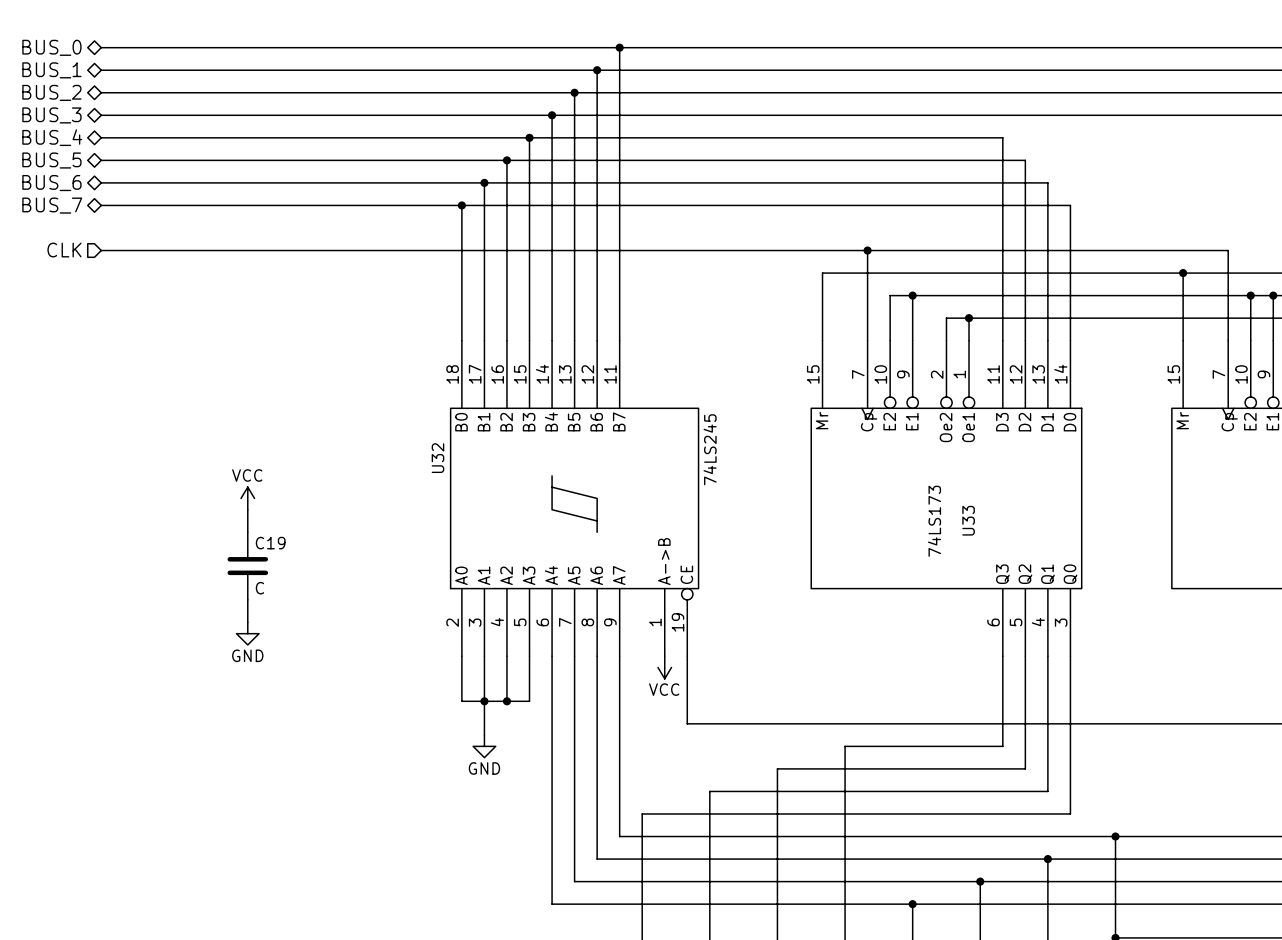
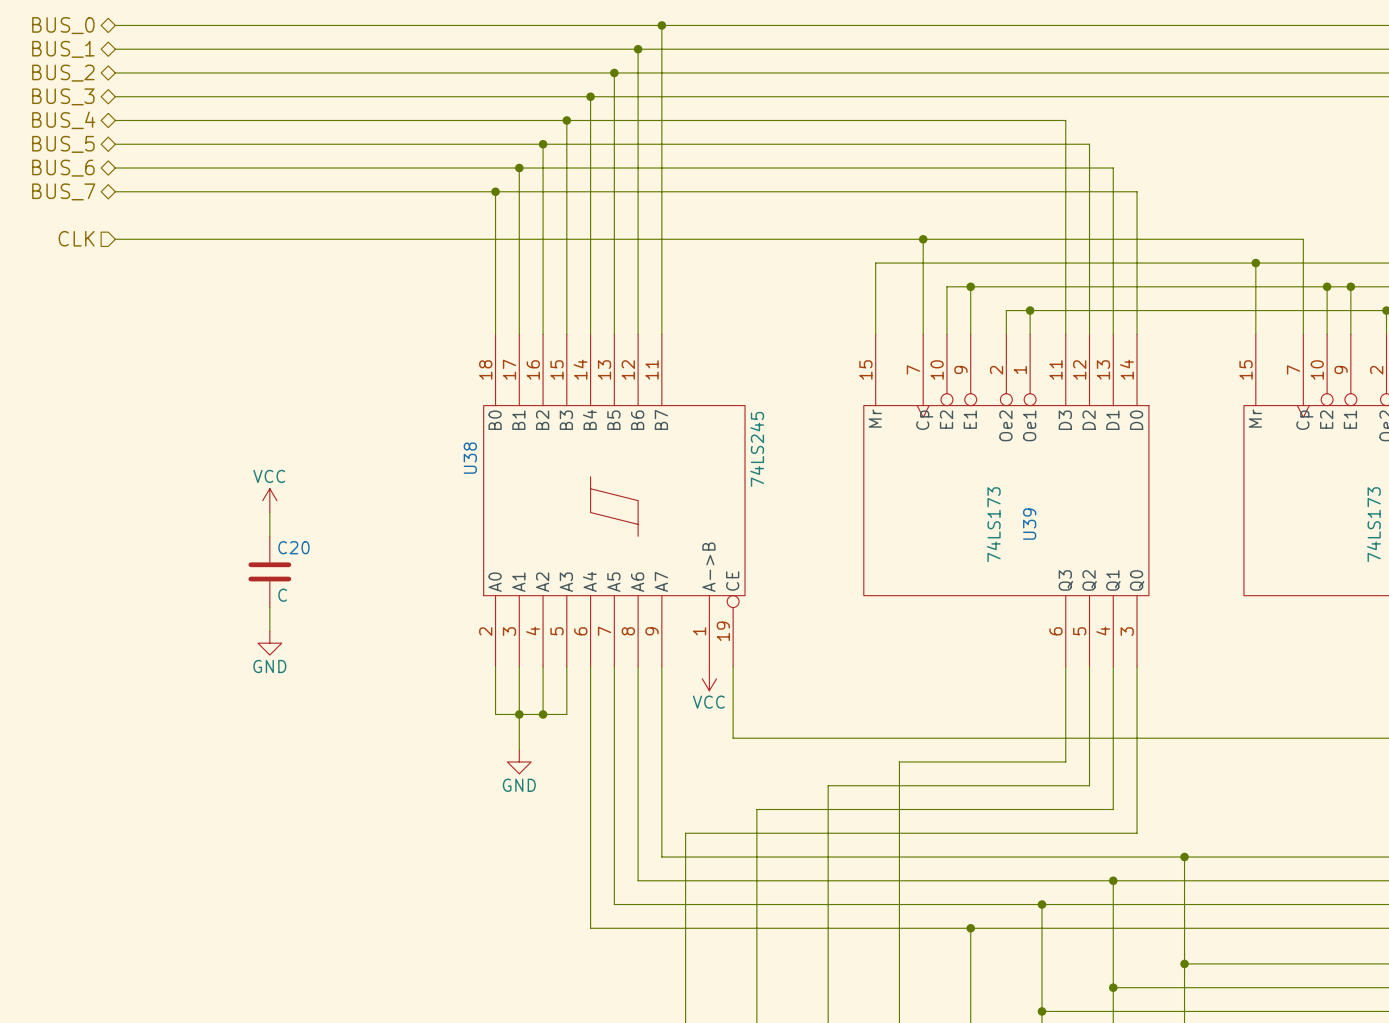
U32 name: U32 (437, 458) -> U38 (470, 458)
U33 name: U33 (968, 520) -> U39 (1029, 524)
C19 name: C19 (270, 543) -> C20 (293, 547)

